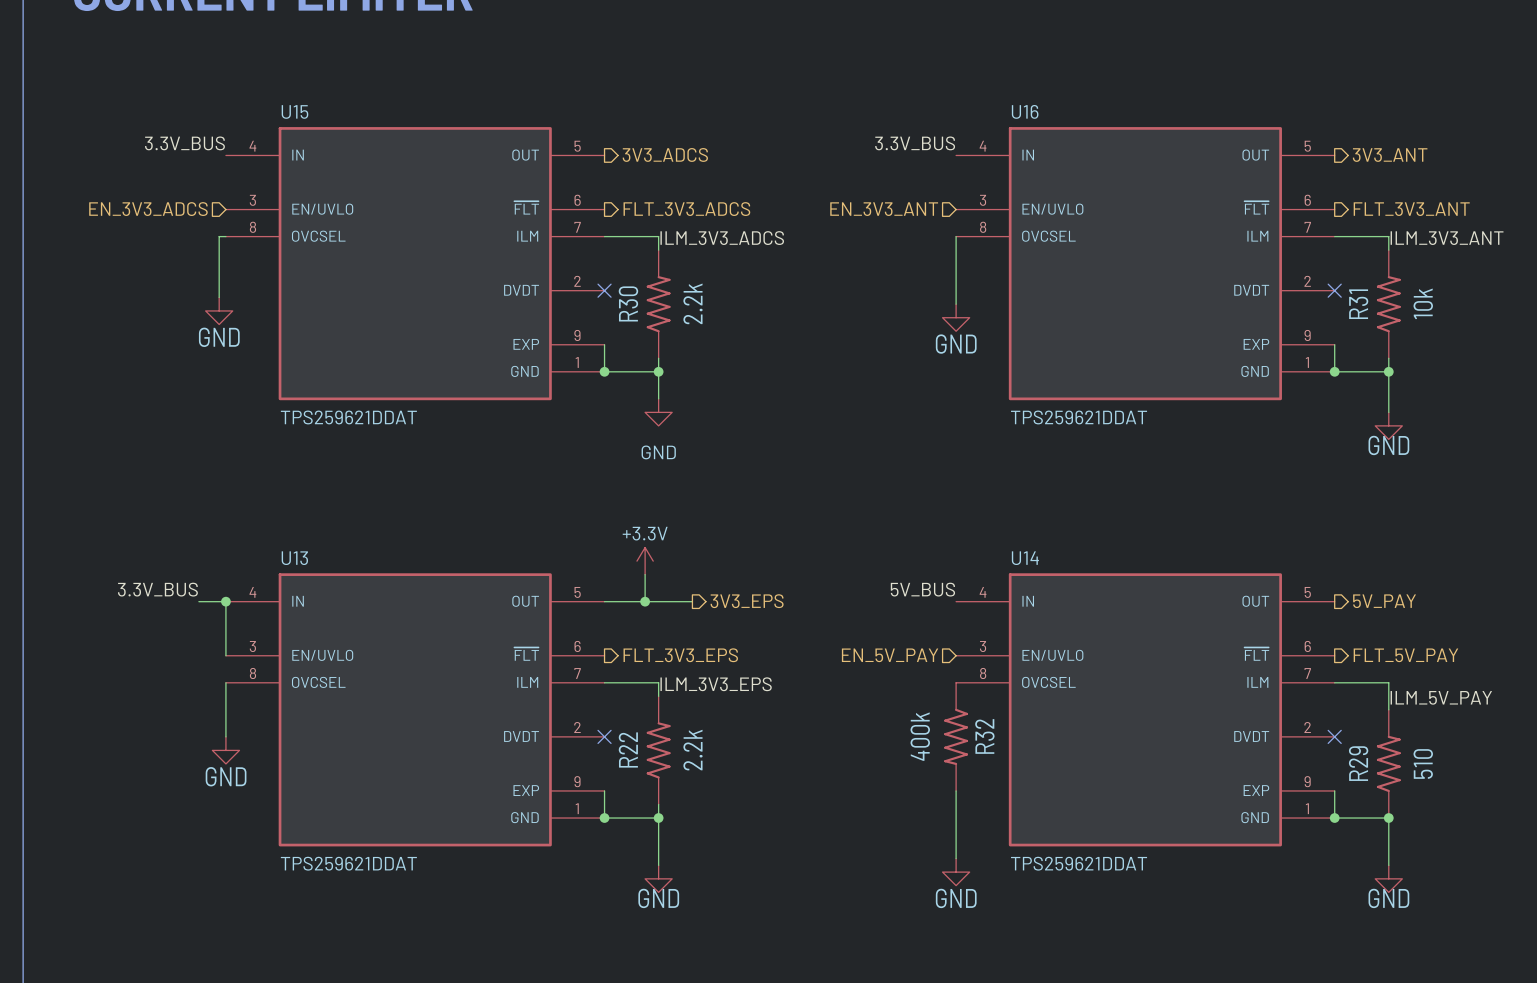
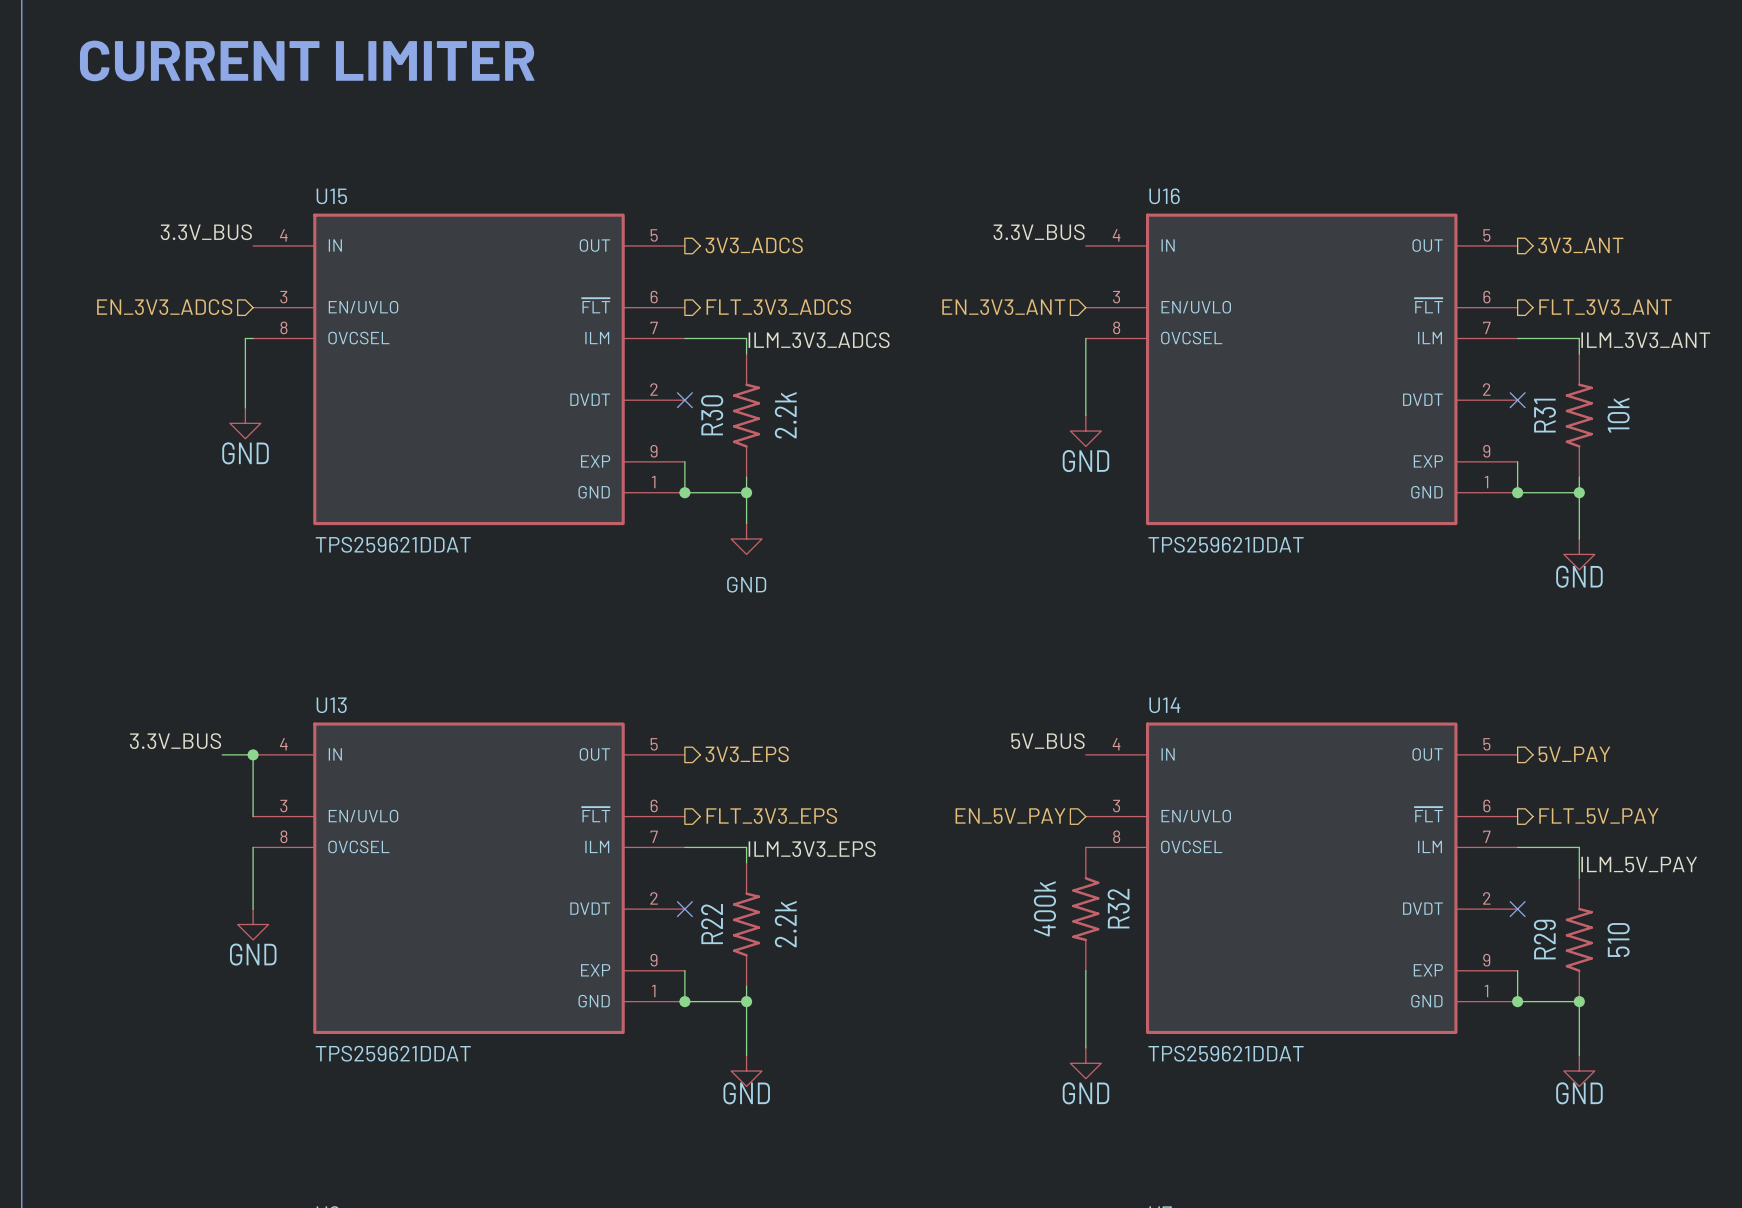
power symbol: +3.3V (645, 561) -> none
wire: (645, 574) (645, 601) -> none
wire: (604, 601) (692, 601) -> none
junction: (645, 601) -> none
hierarchical label position: 3V3_EPS (747, 601) -> 3V3_EPS (747, 754)

